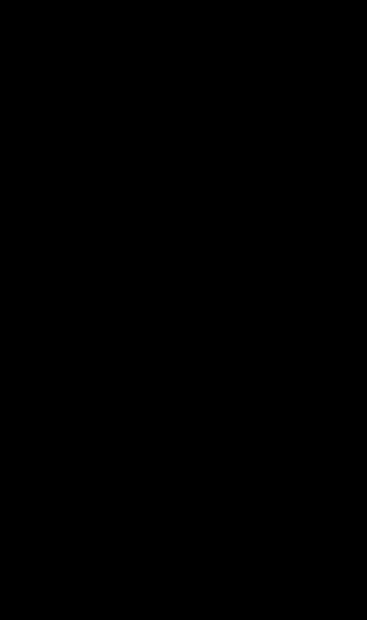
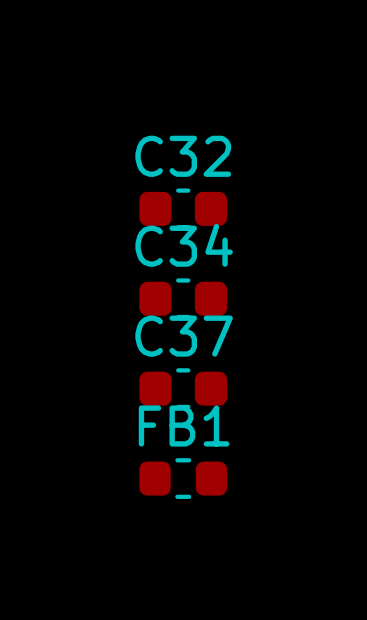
C32: none -> (183, 208)
C34: none -> (183, 298)
C37: none -> (183, 388)
FB1: none -> (183, 478)

